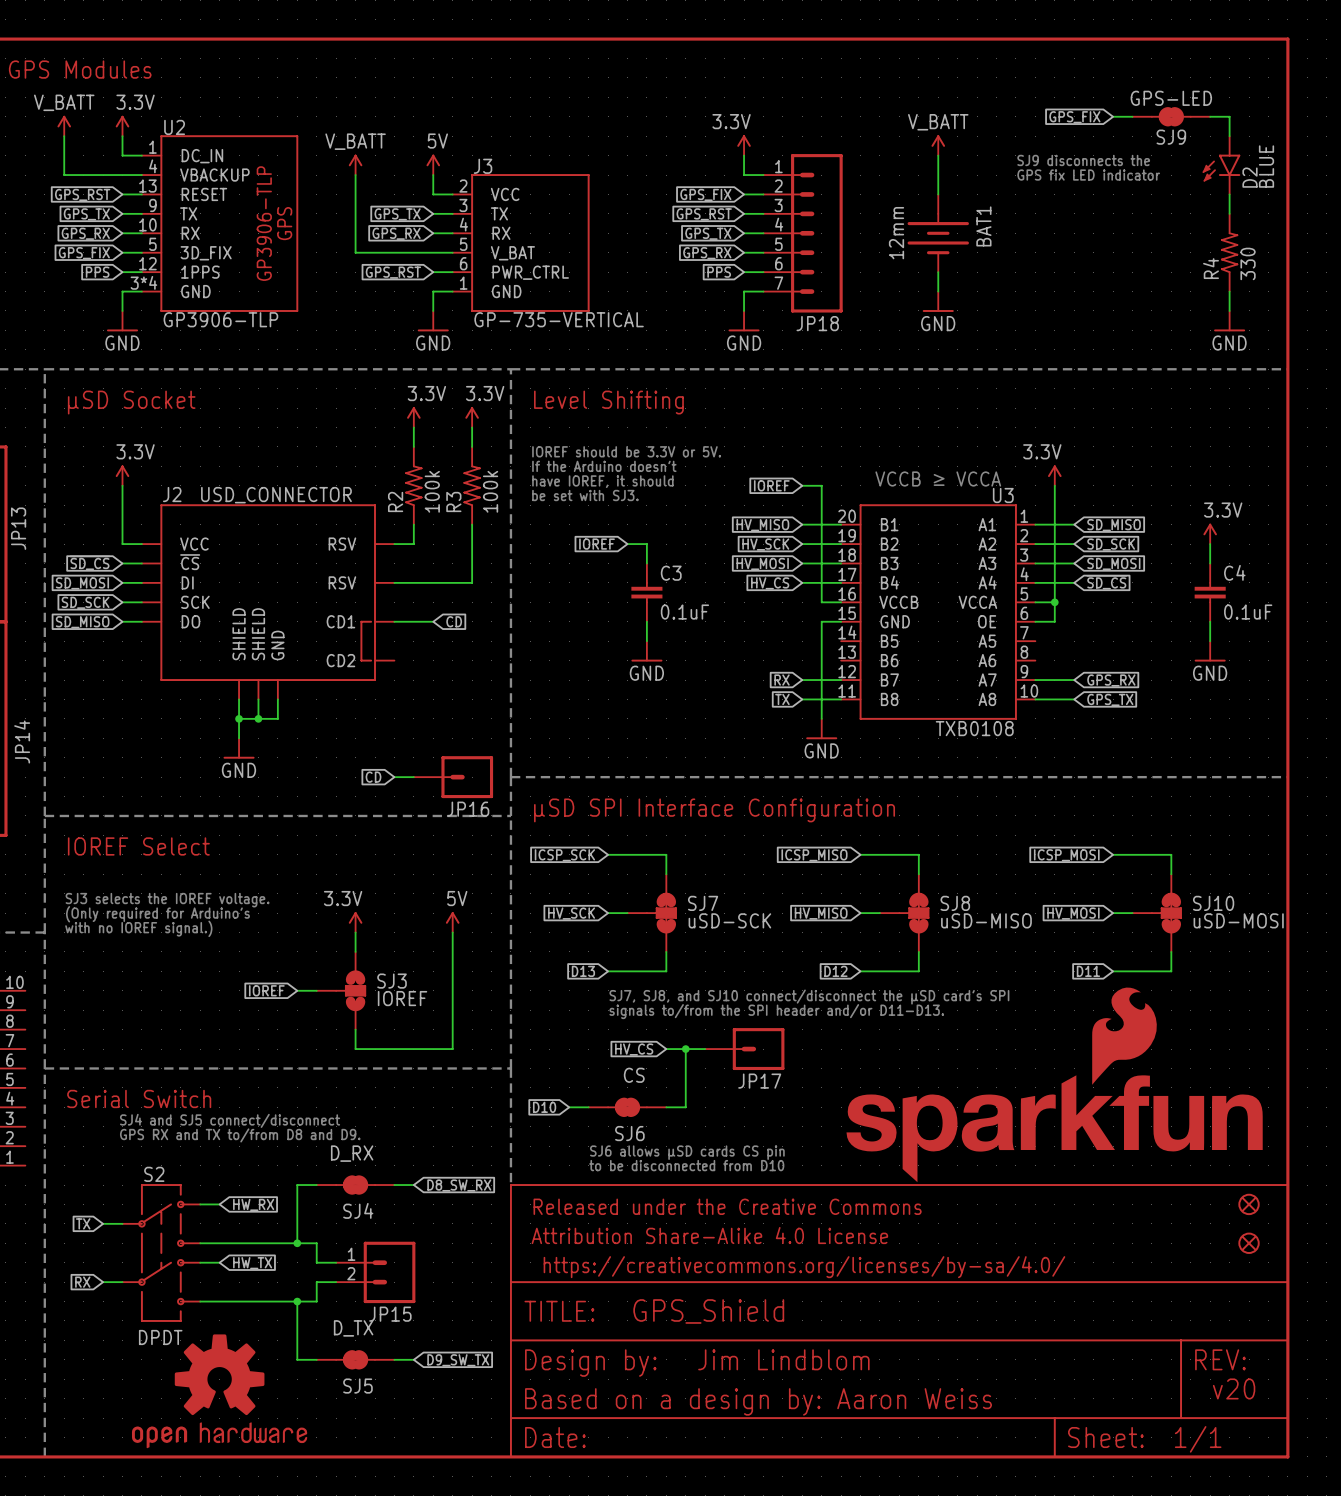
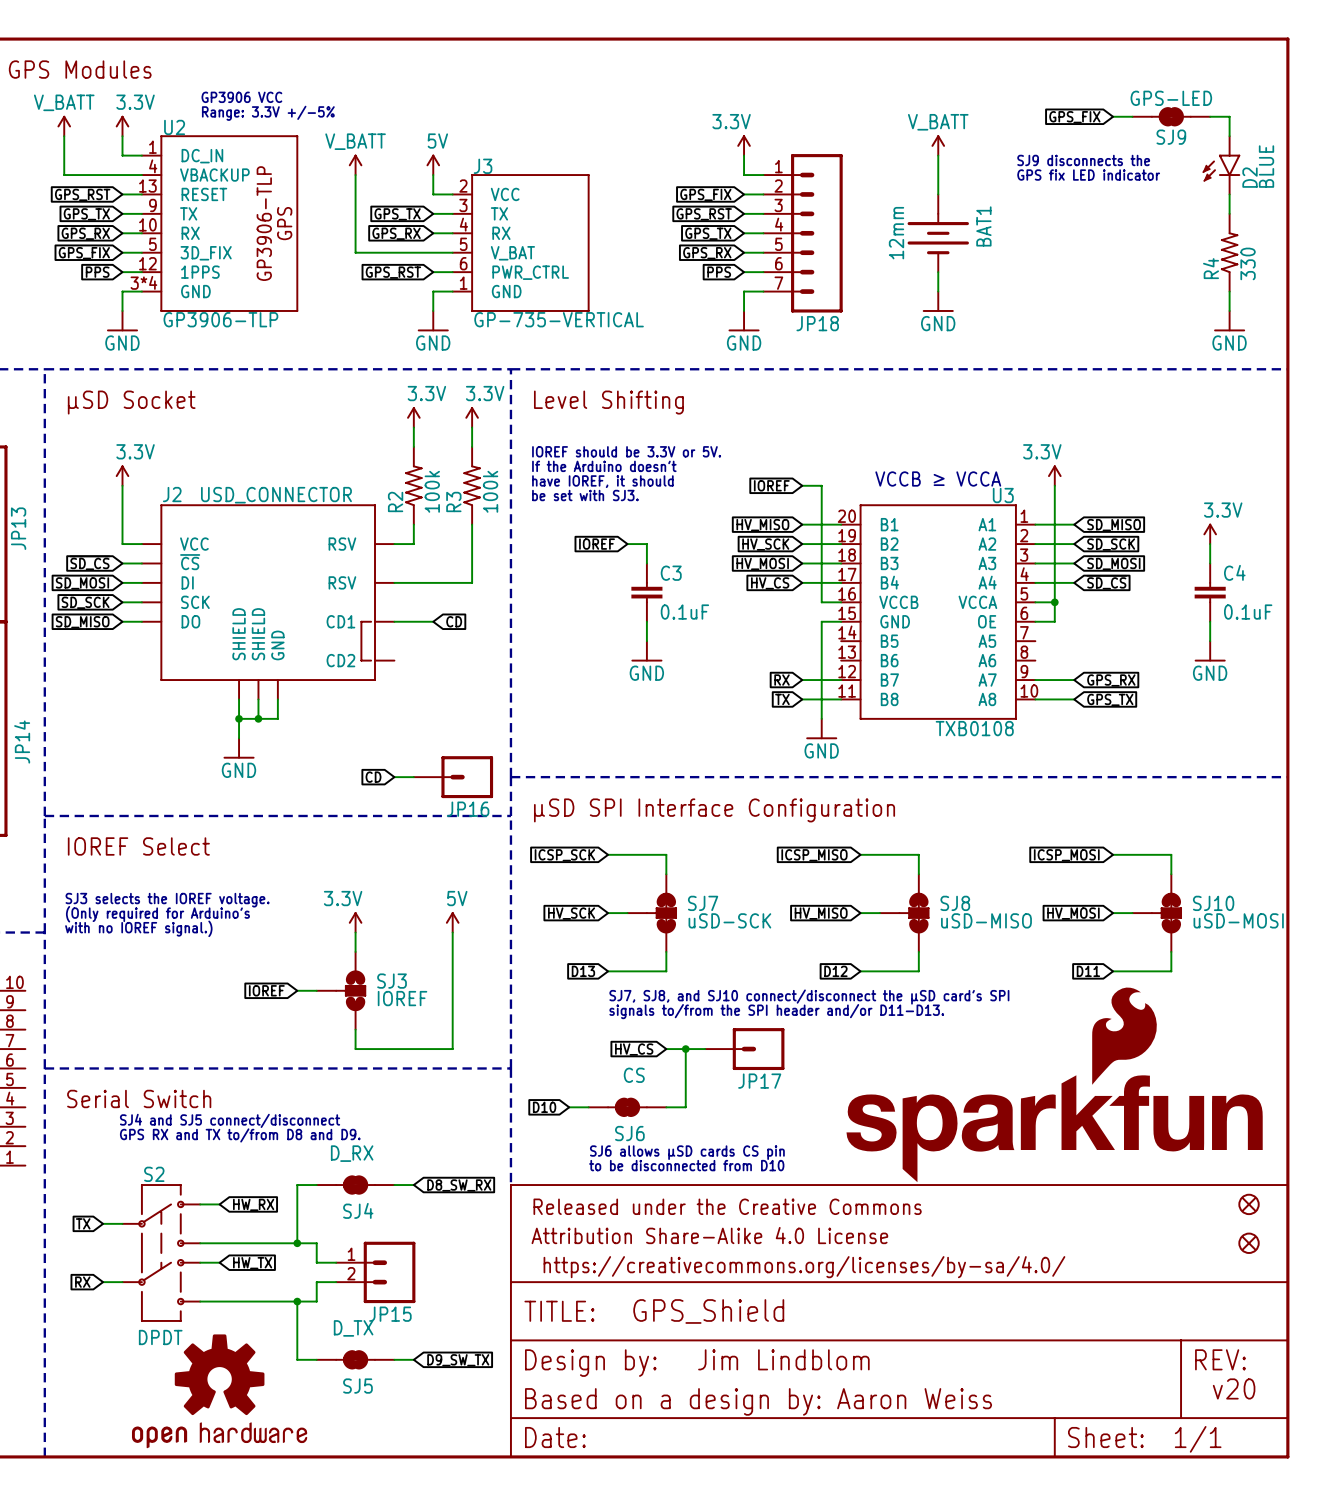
text: none -> GP3906 VCC (241, 97)
text: none -> Range: 3.3V +/-5% (268, 113)

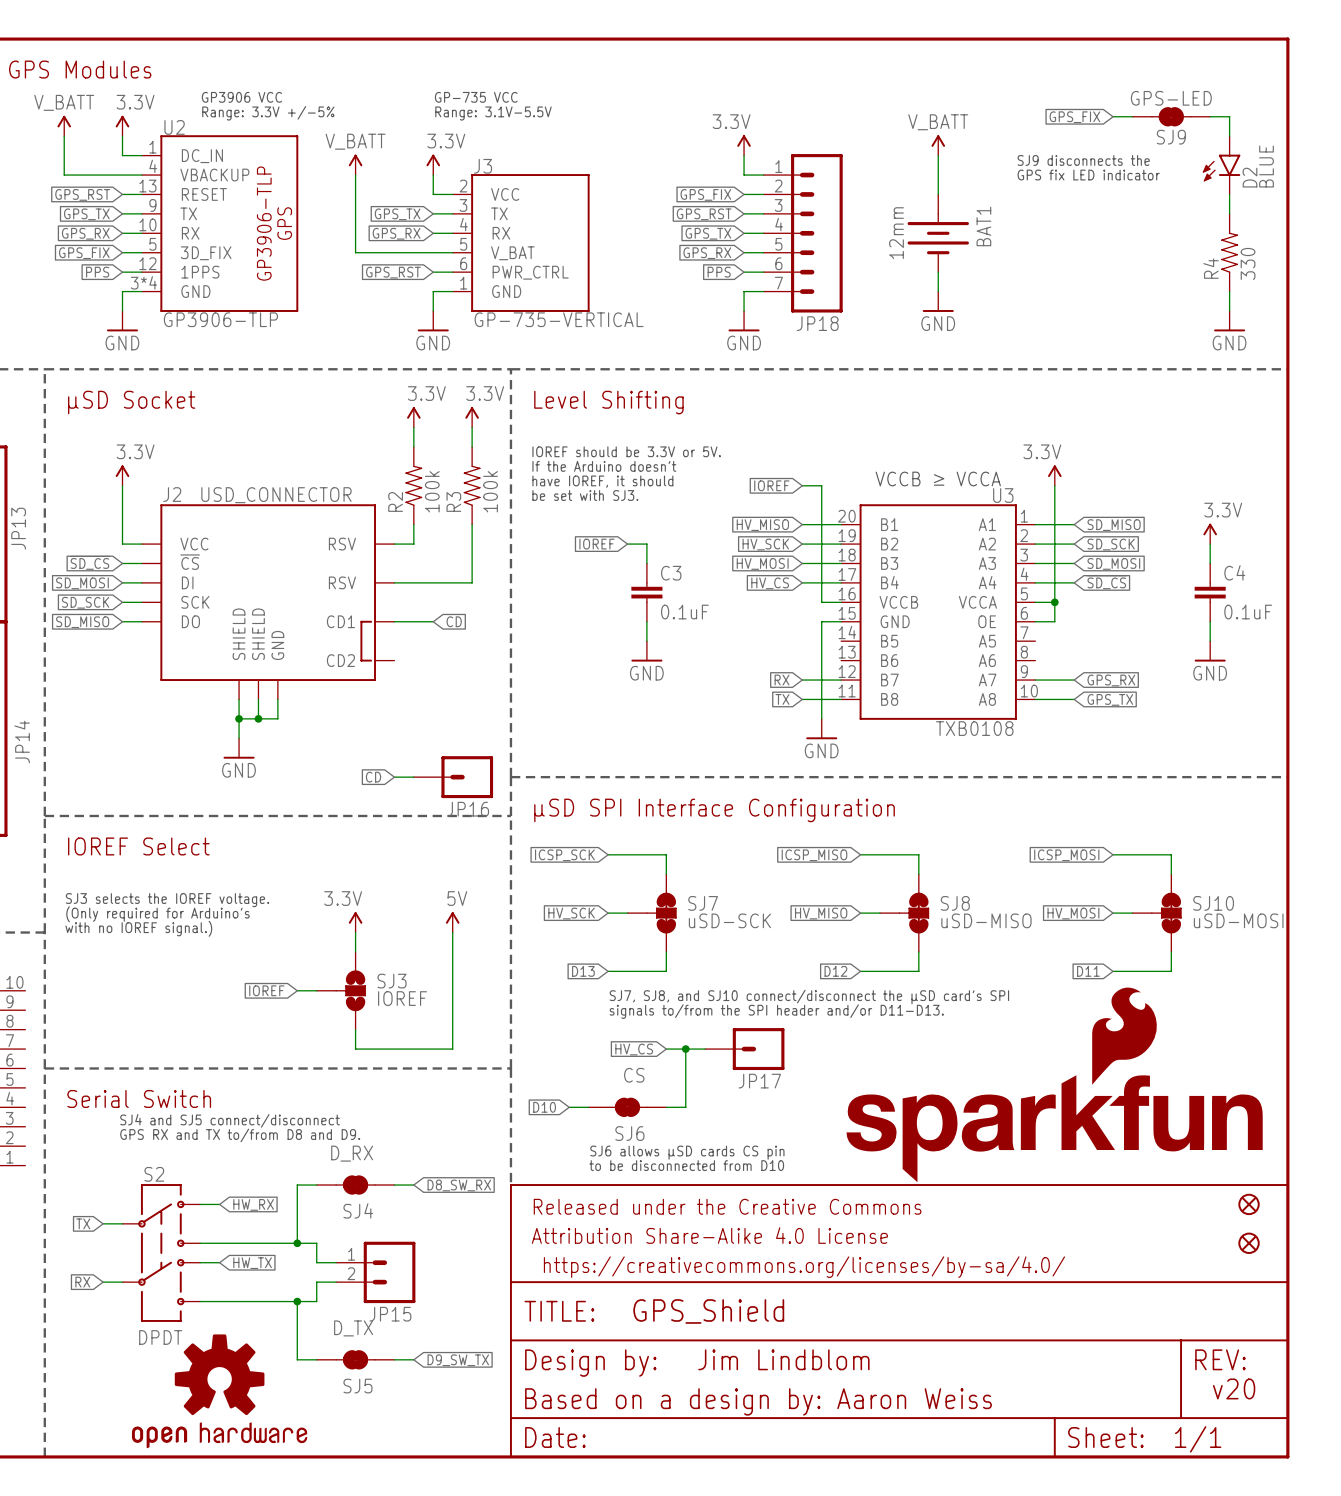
text: none -> GP-735 VCC (476, 97)
text: none -> Range: 3.1V-5.5V (493, 113)
power symbol: 5V (433, 164) -> 3.3V (433, 164)

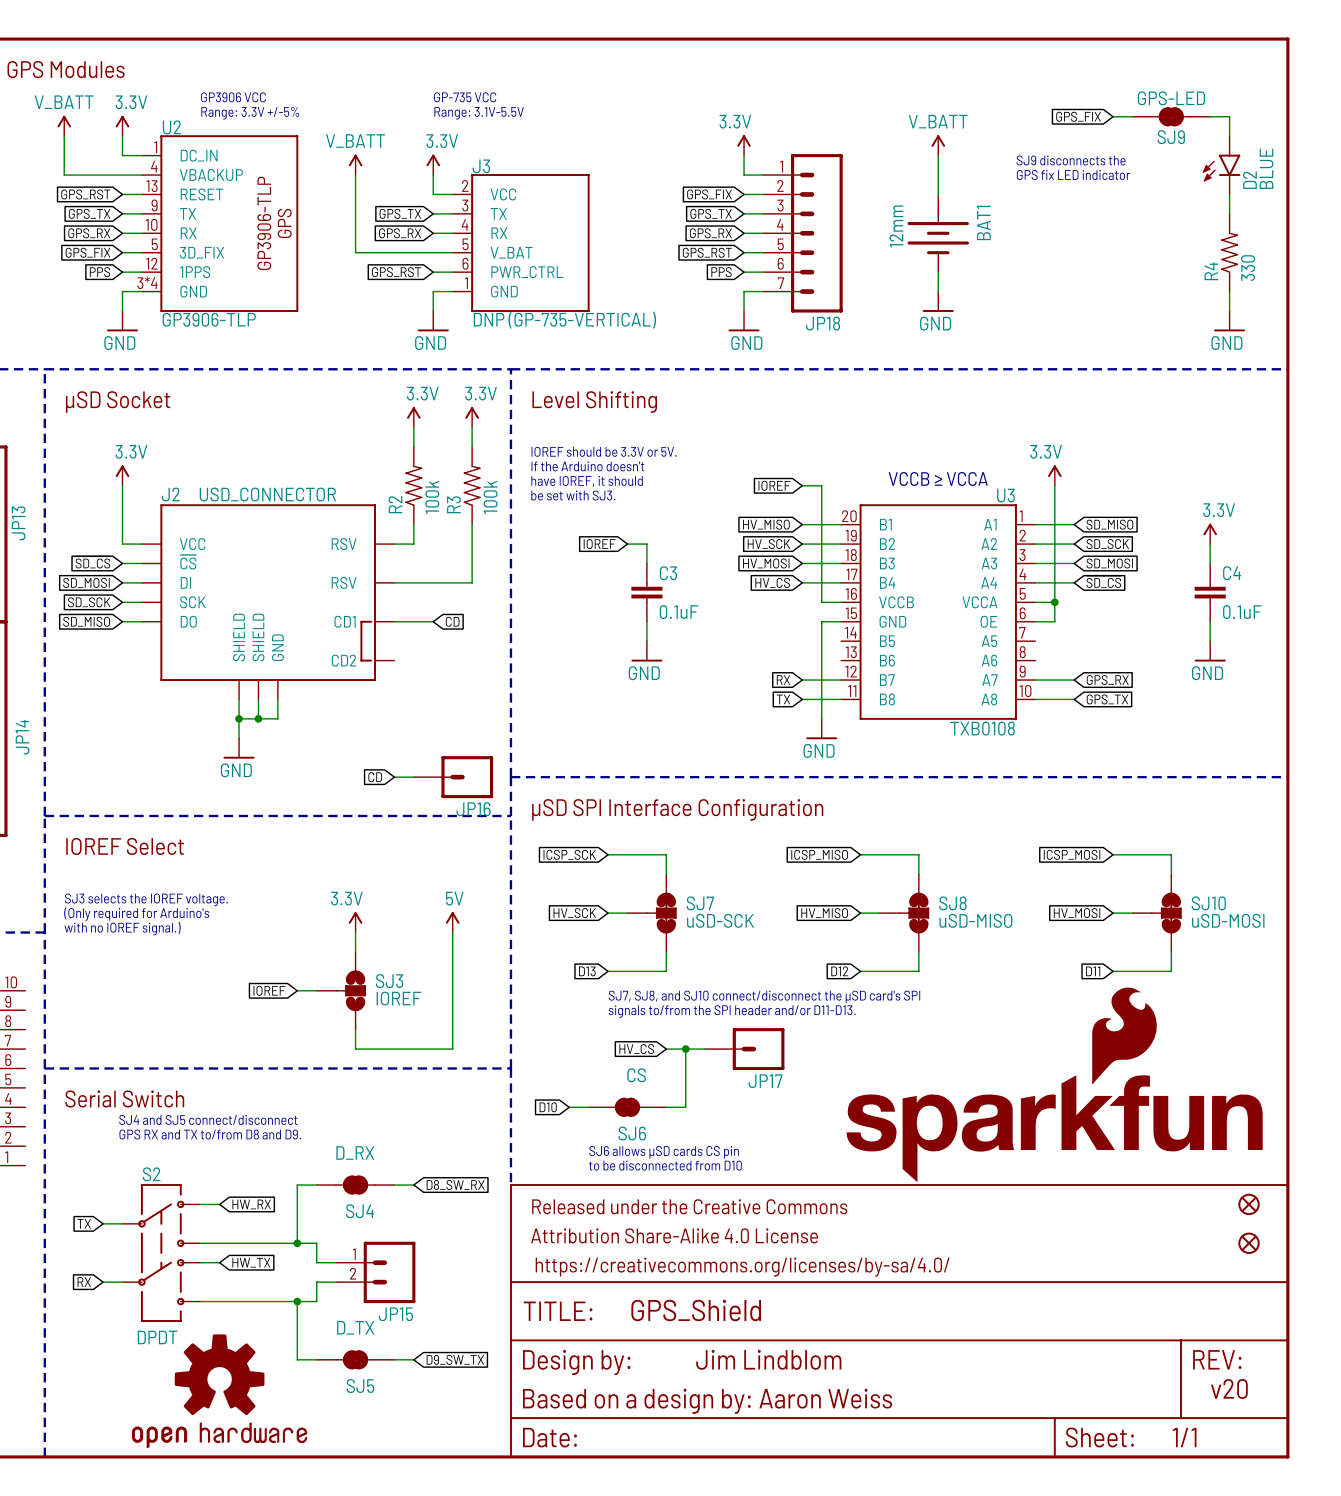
global label: GPS_RST (704, 214) -> GPS_TX (711, 213)
global label: GPS_TX (708, 233) -> GPS_RX (710, 233)
global label: GPS_RX (707, 253) -> GPS_RST (707, 252)
J3 value: GP-735-VERTICAL (559, 319) -> DNP (GP-735-VERTICAL) (564, 320)

